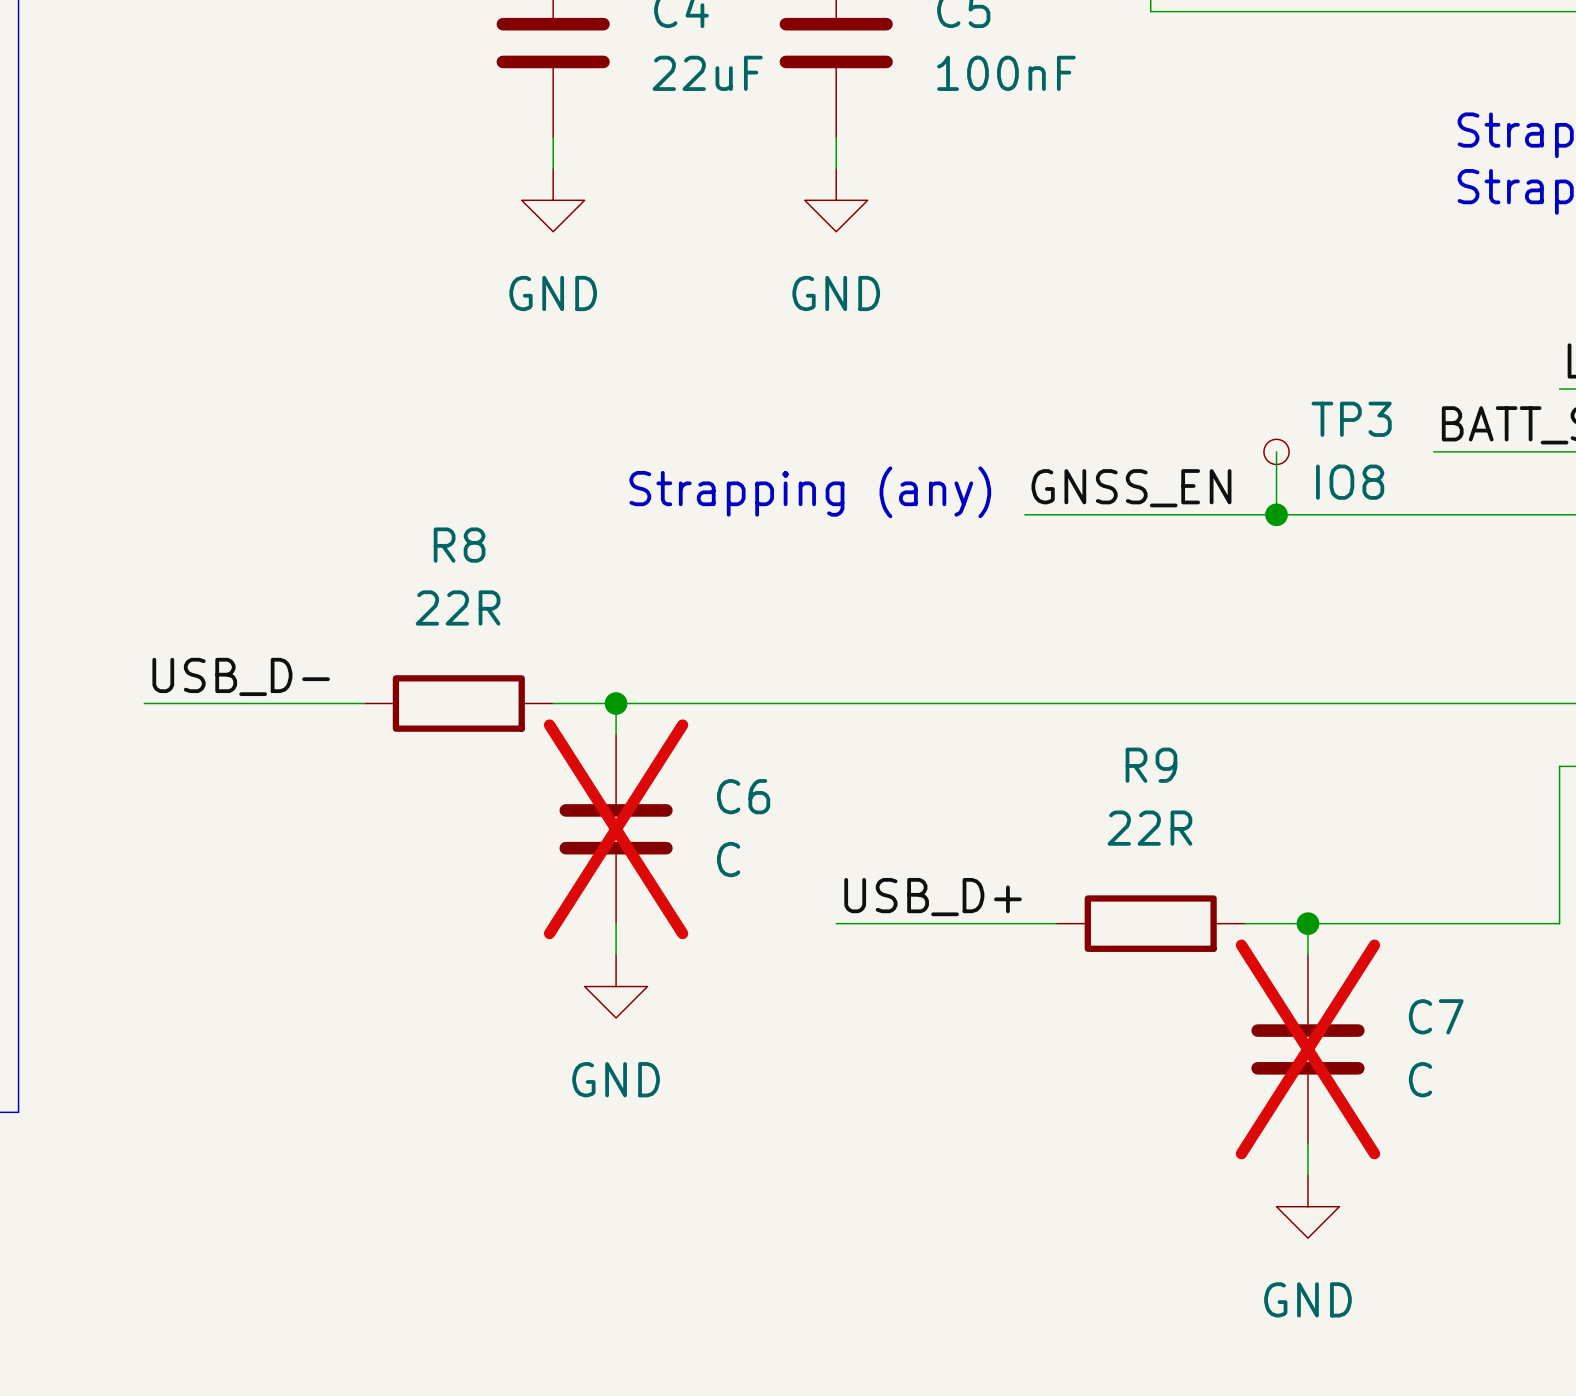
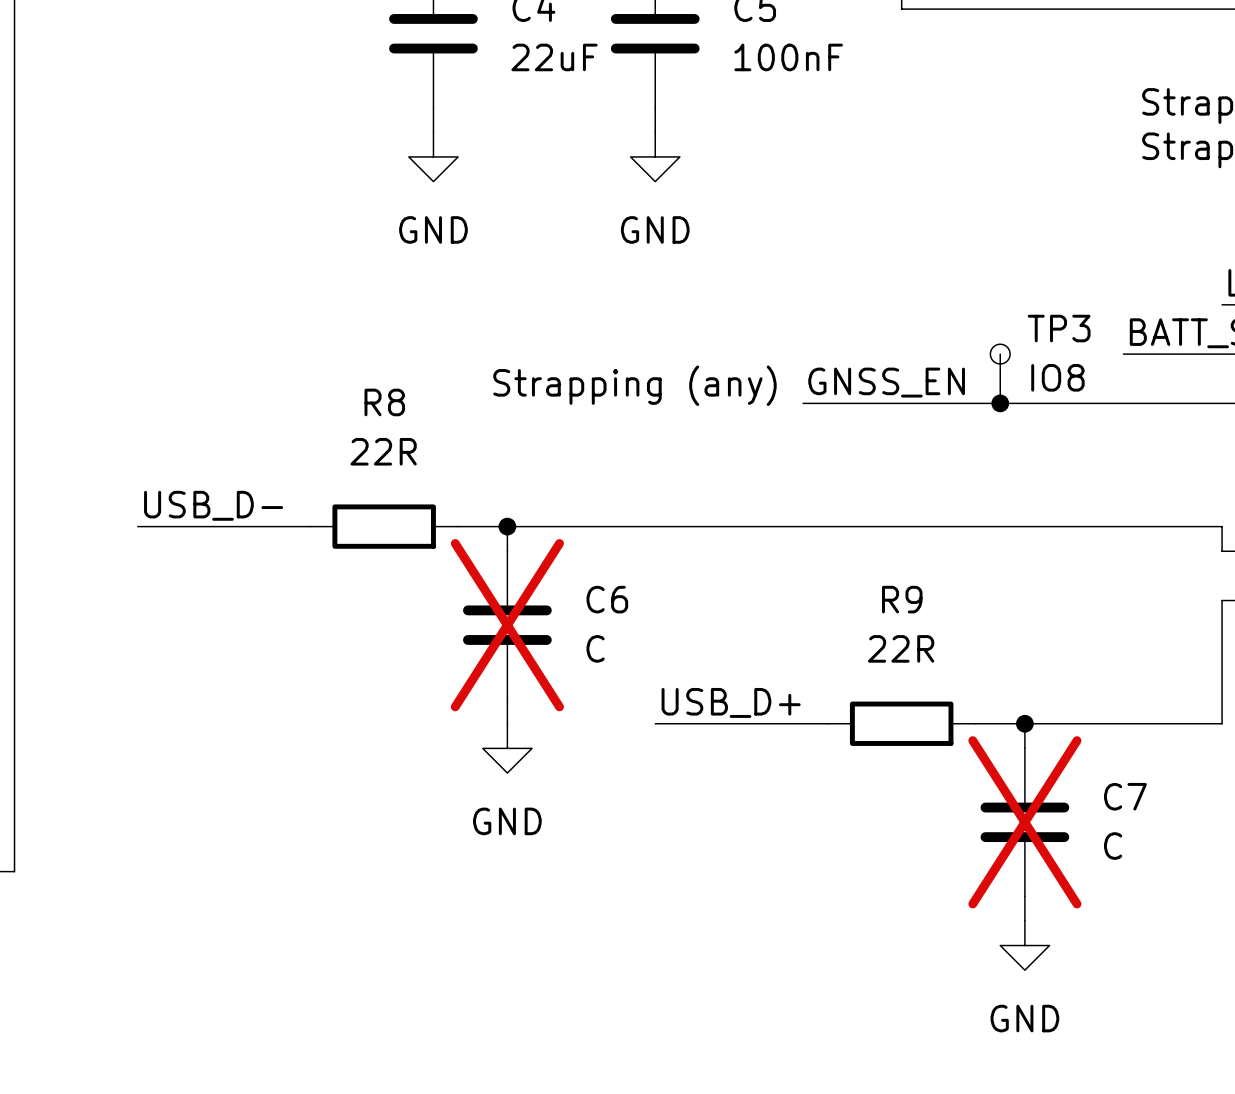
label position: USB_D- (241, 676) -> USB_D- (213, 505)
wire: (144, 703) (364, 703) -> (137, 526) (310, 526)
R8 position: (458, 703) -> (384, 526)
wire: (553, 703) (1559, 703) -> (458, 526) (1222, 526) (1222, 551)
wire: (616, 703) (616, 734) -> (507, 526) (507, 551)
junction position: (616, 703) -> (507, 526)
C6 position: (616, 829) -> (507, 625)
wire: (616, 923) (616, 955) -> (507, 699) (507, 723)
power symbol position: GND (616, 986) -> GND (507, 748)

